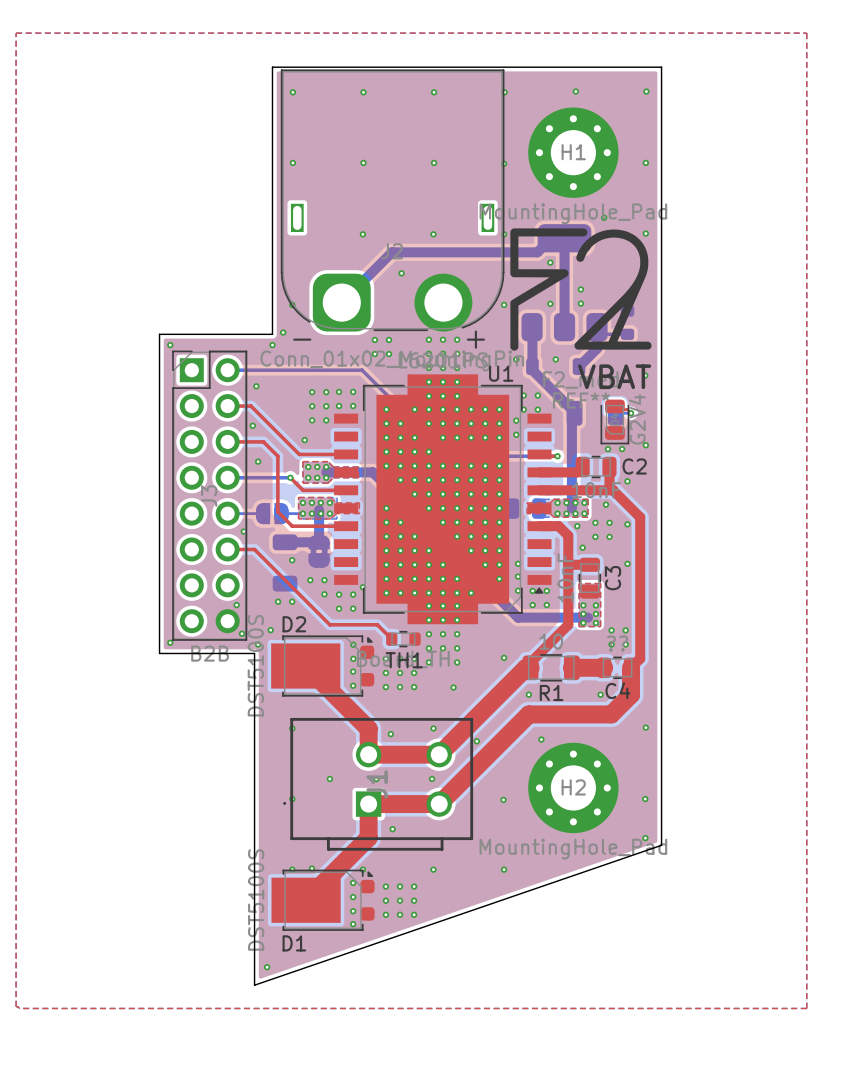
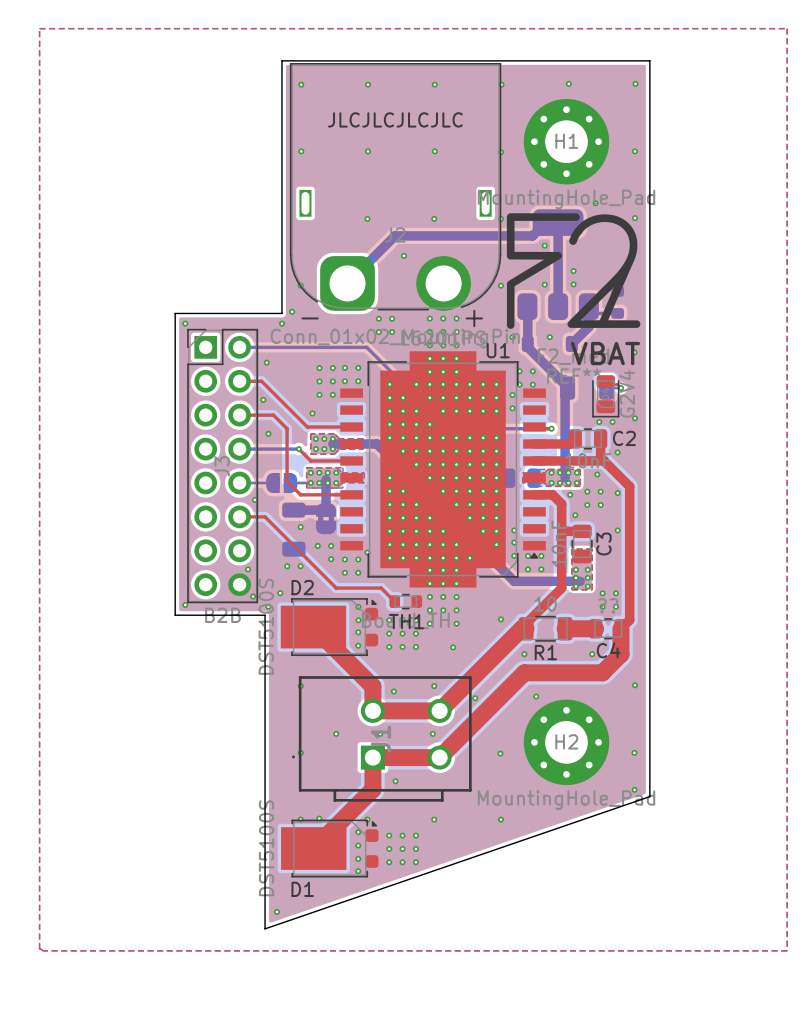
text: none -> JLCJLCJLCJLC (395, 119)

